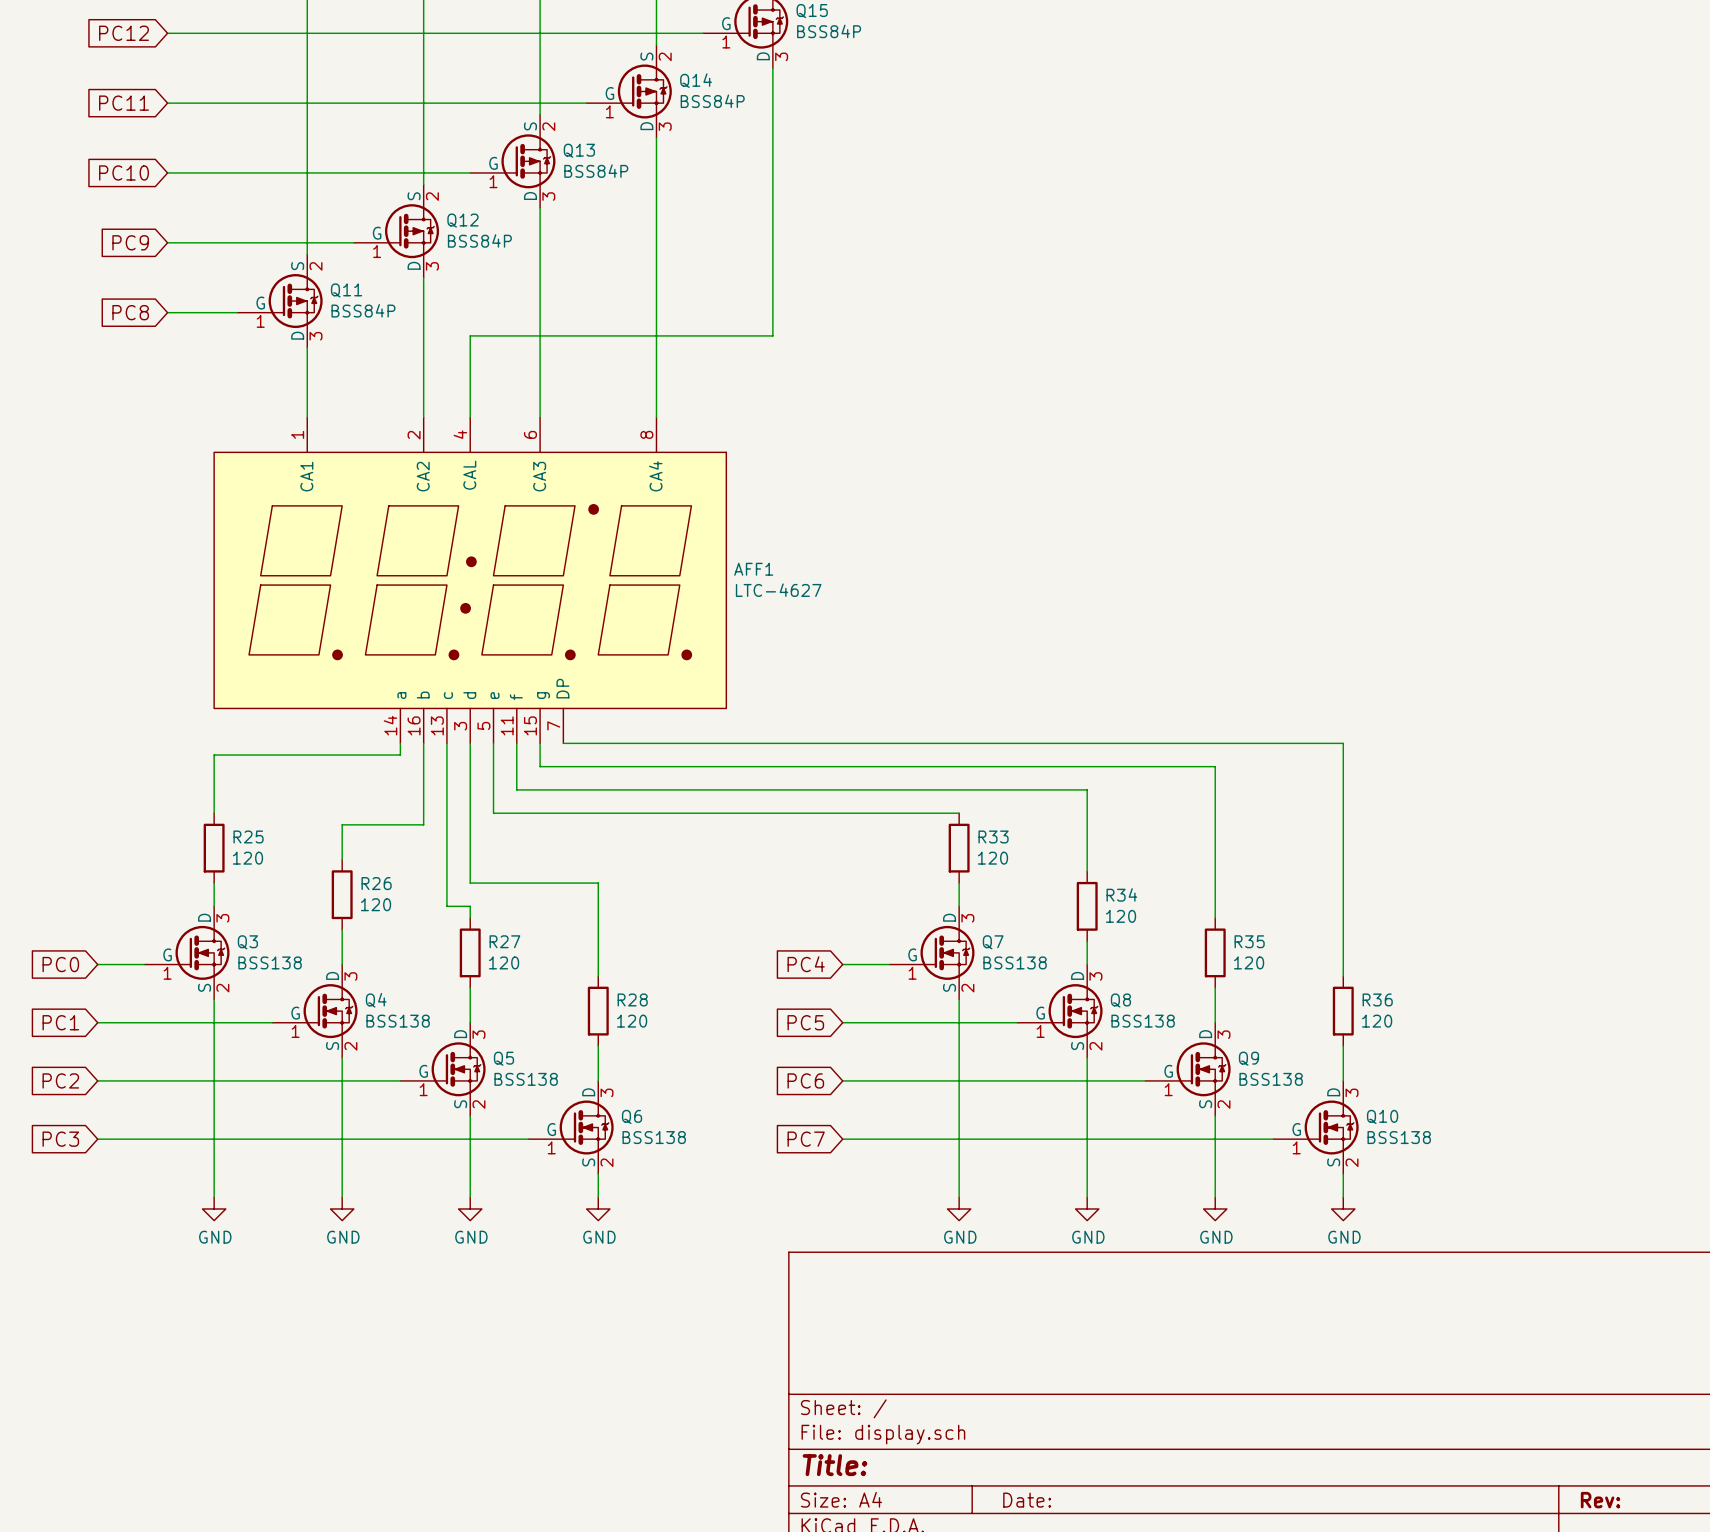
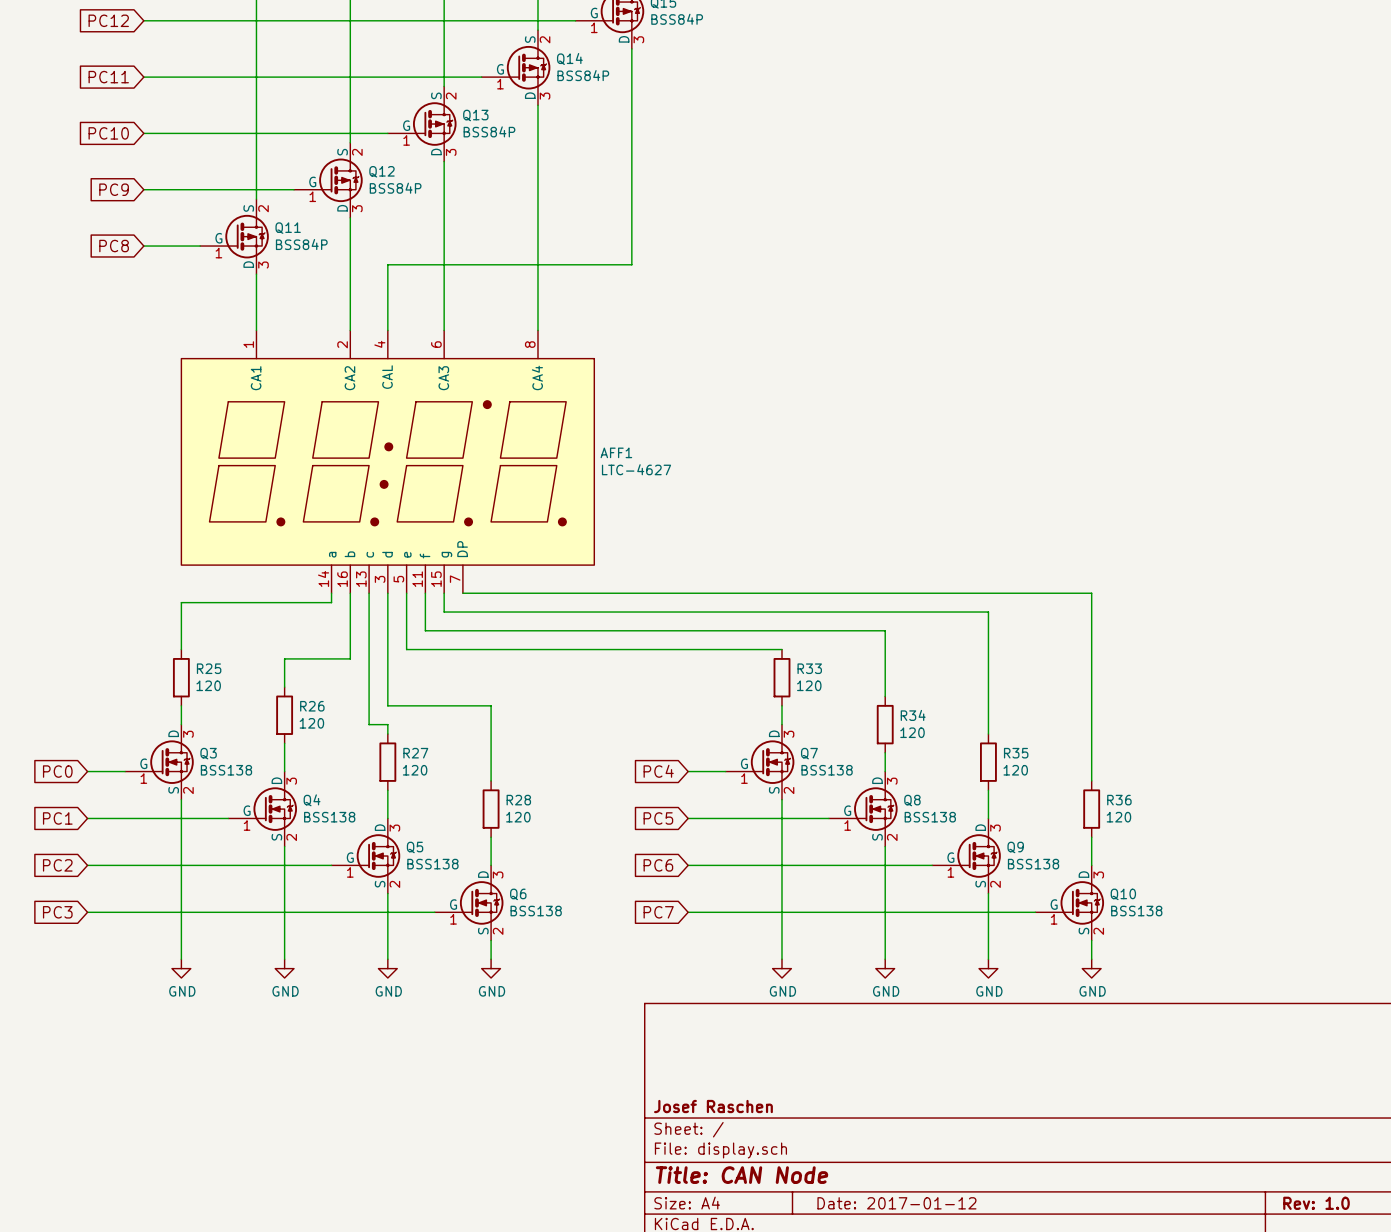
title block: none -> Josef Raschen (713, 1106)
title block: Title: (834, 1465) -> Title: CAN Node (742, 1175)
title block: Date: (1027, 1500) -> Date: 2017-01-12 (896, 1203)
title block: Rev: (1600, 1500) -> Rev: 1.0 (1316, 1203)

